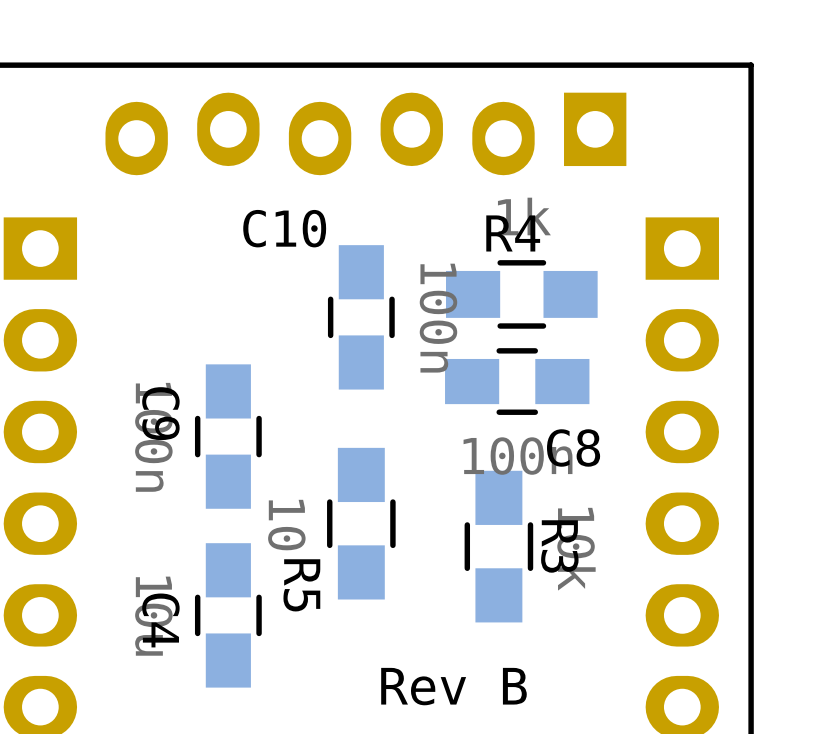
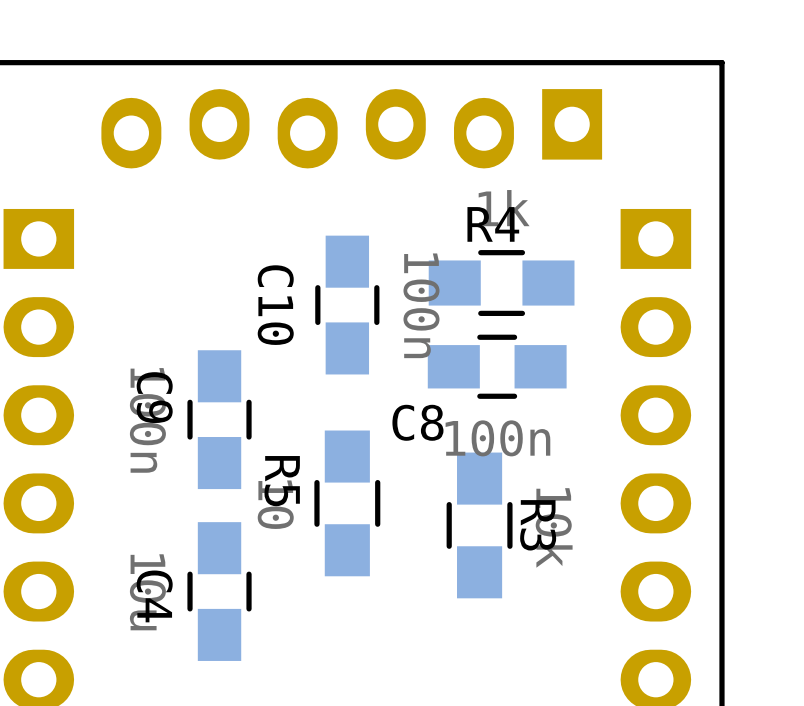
C10 name rotation: 0° (284, 228) -> 90° clockwise (275, 305)
C8 name position: C8 (573, 447) -> C8 (417, 422)
R5 name position: R5 (301, 585) -> R5 (282, 481)
text: Rev B (453, 686) -> none

